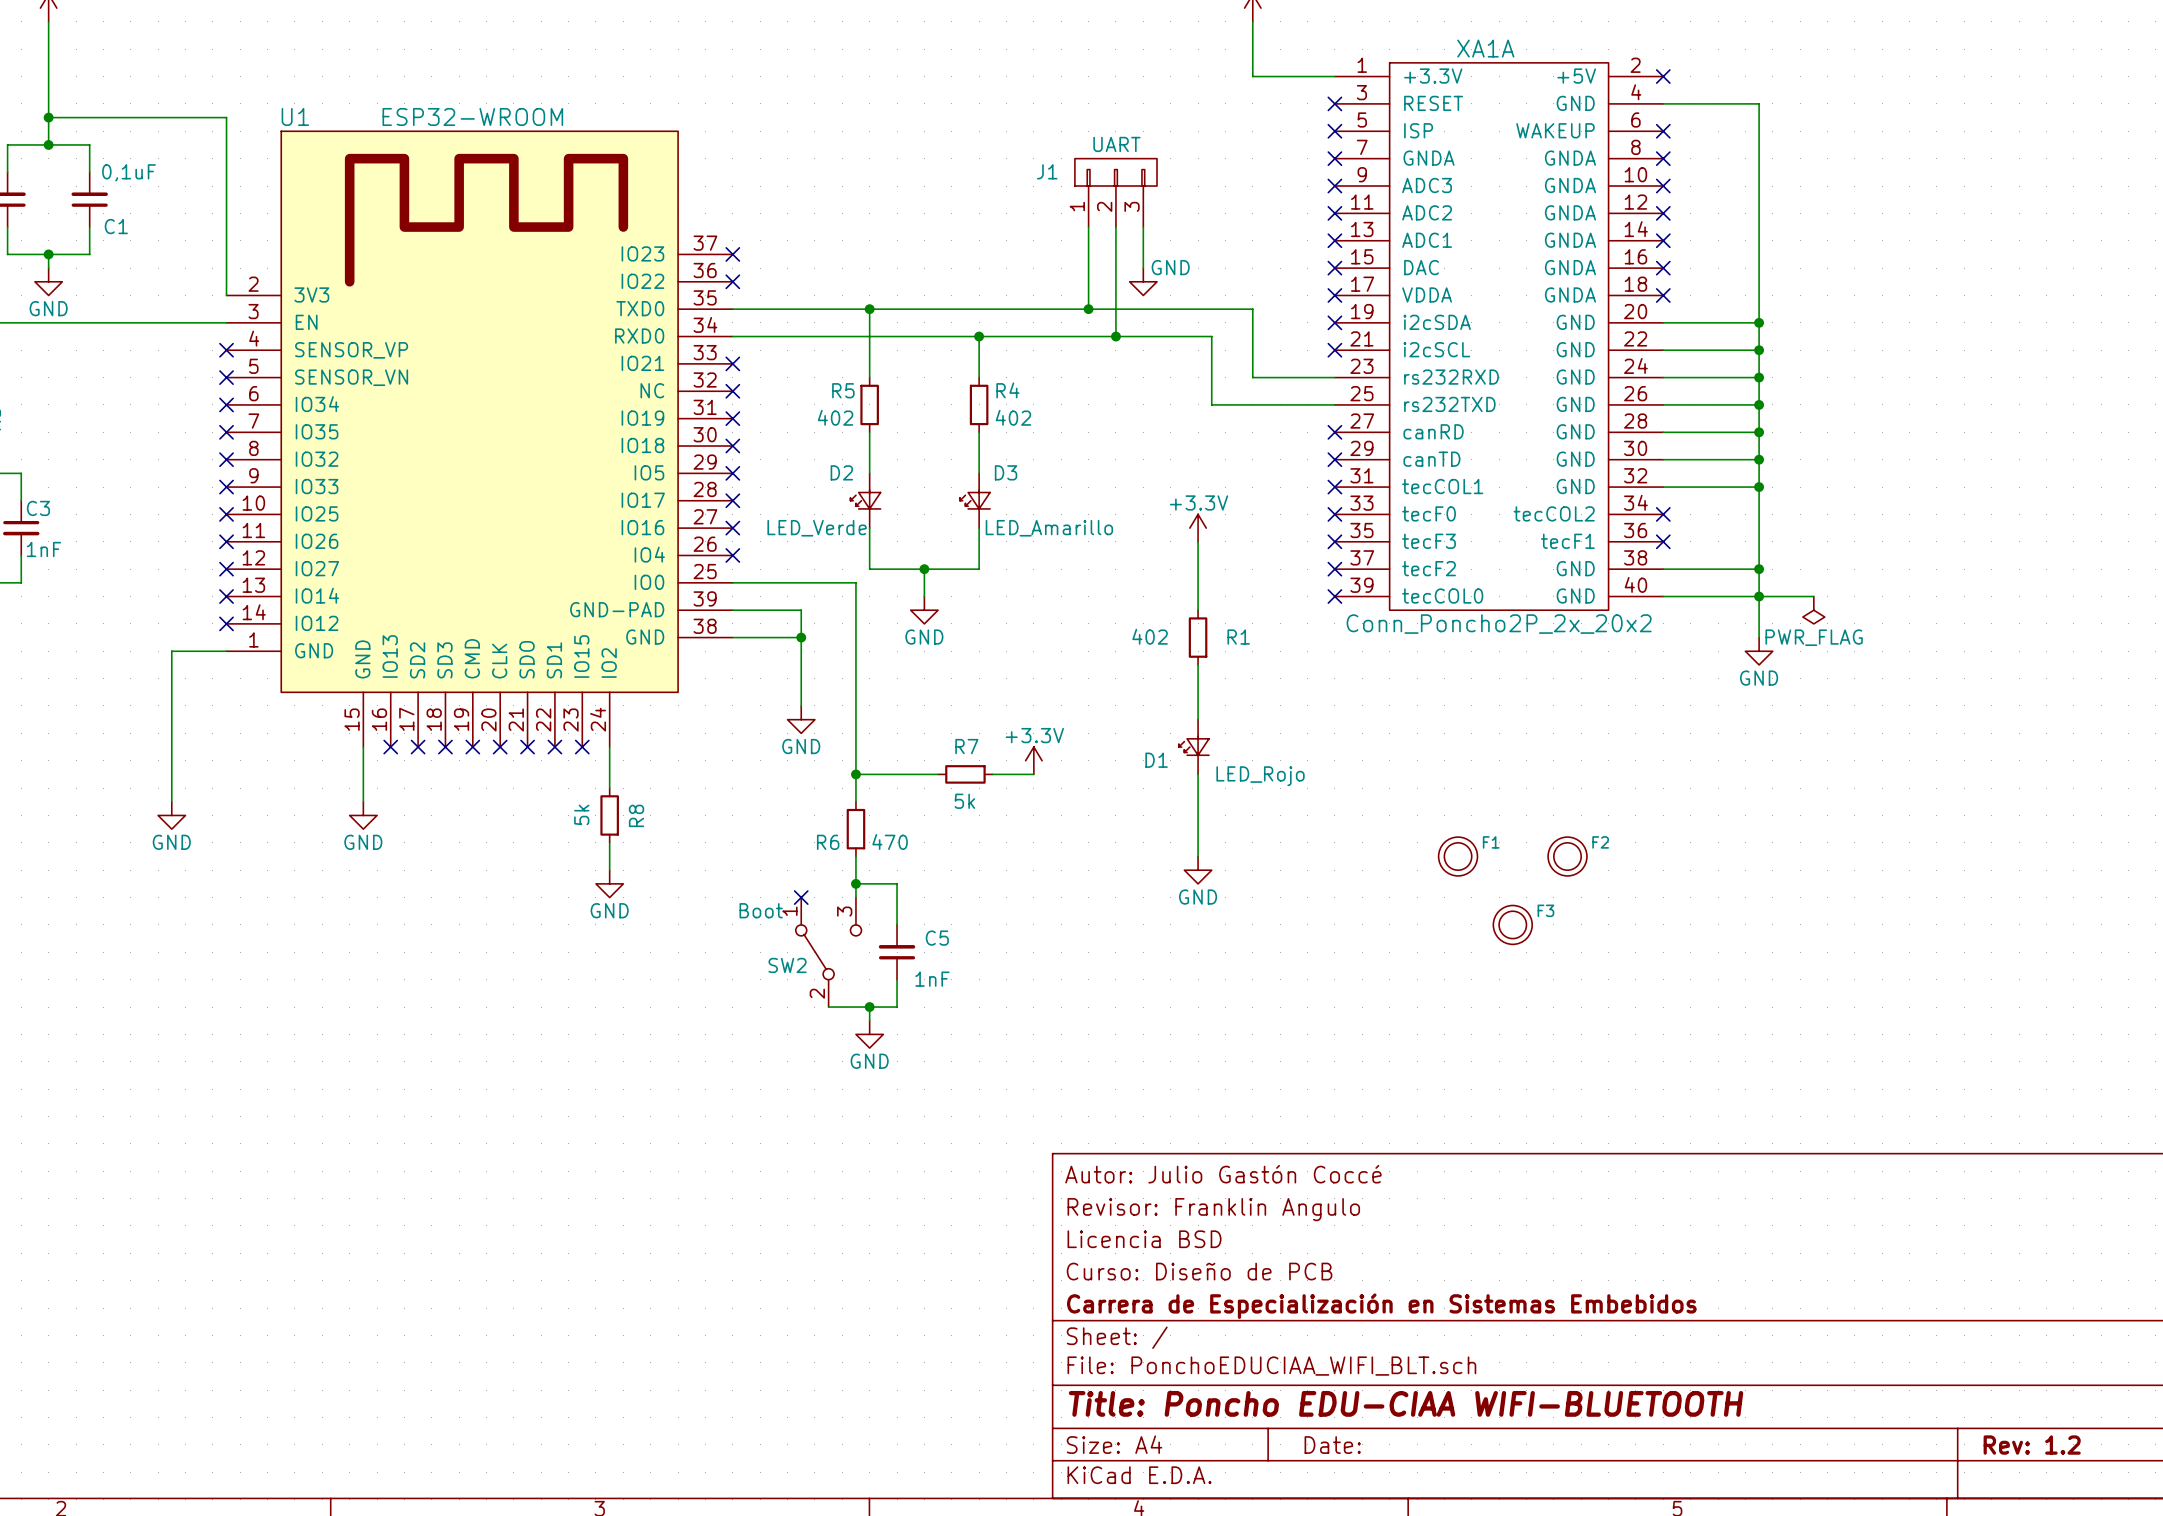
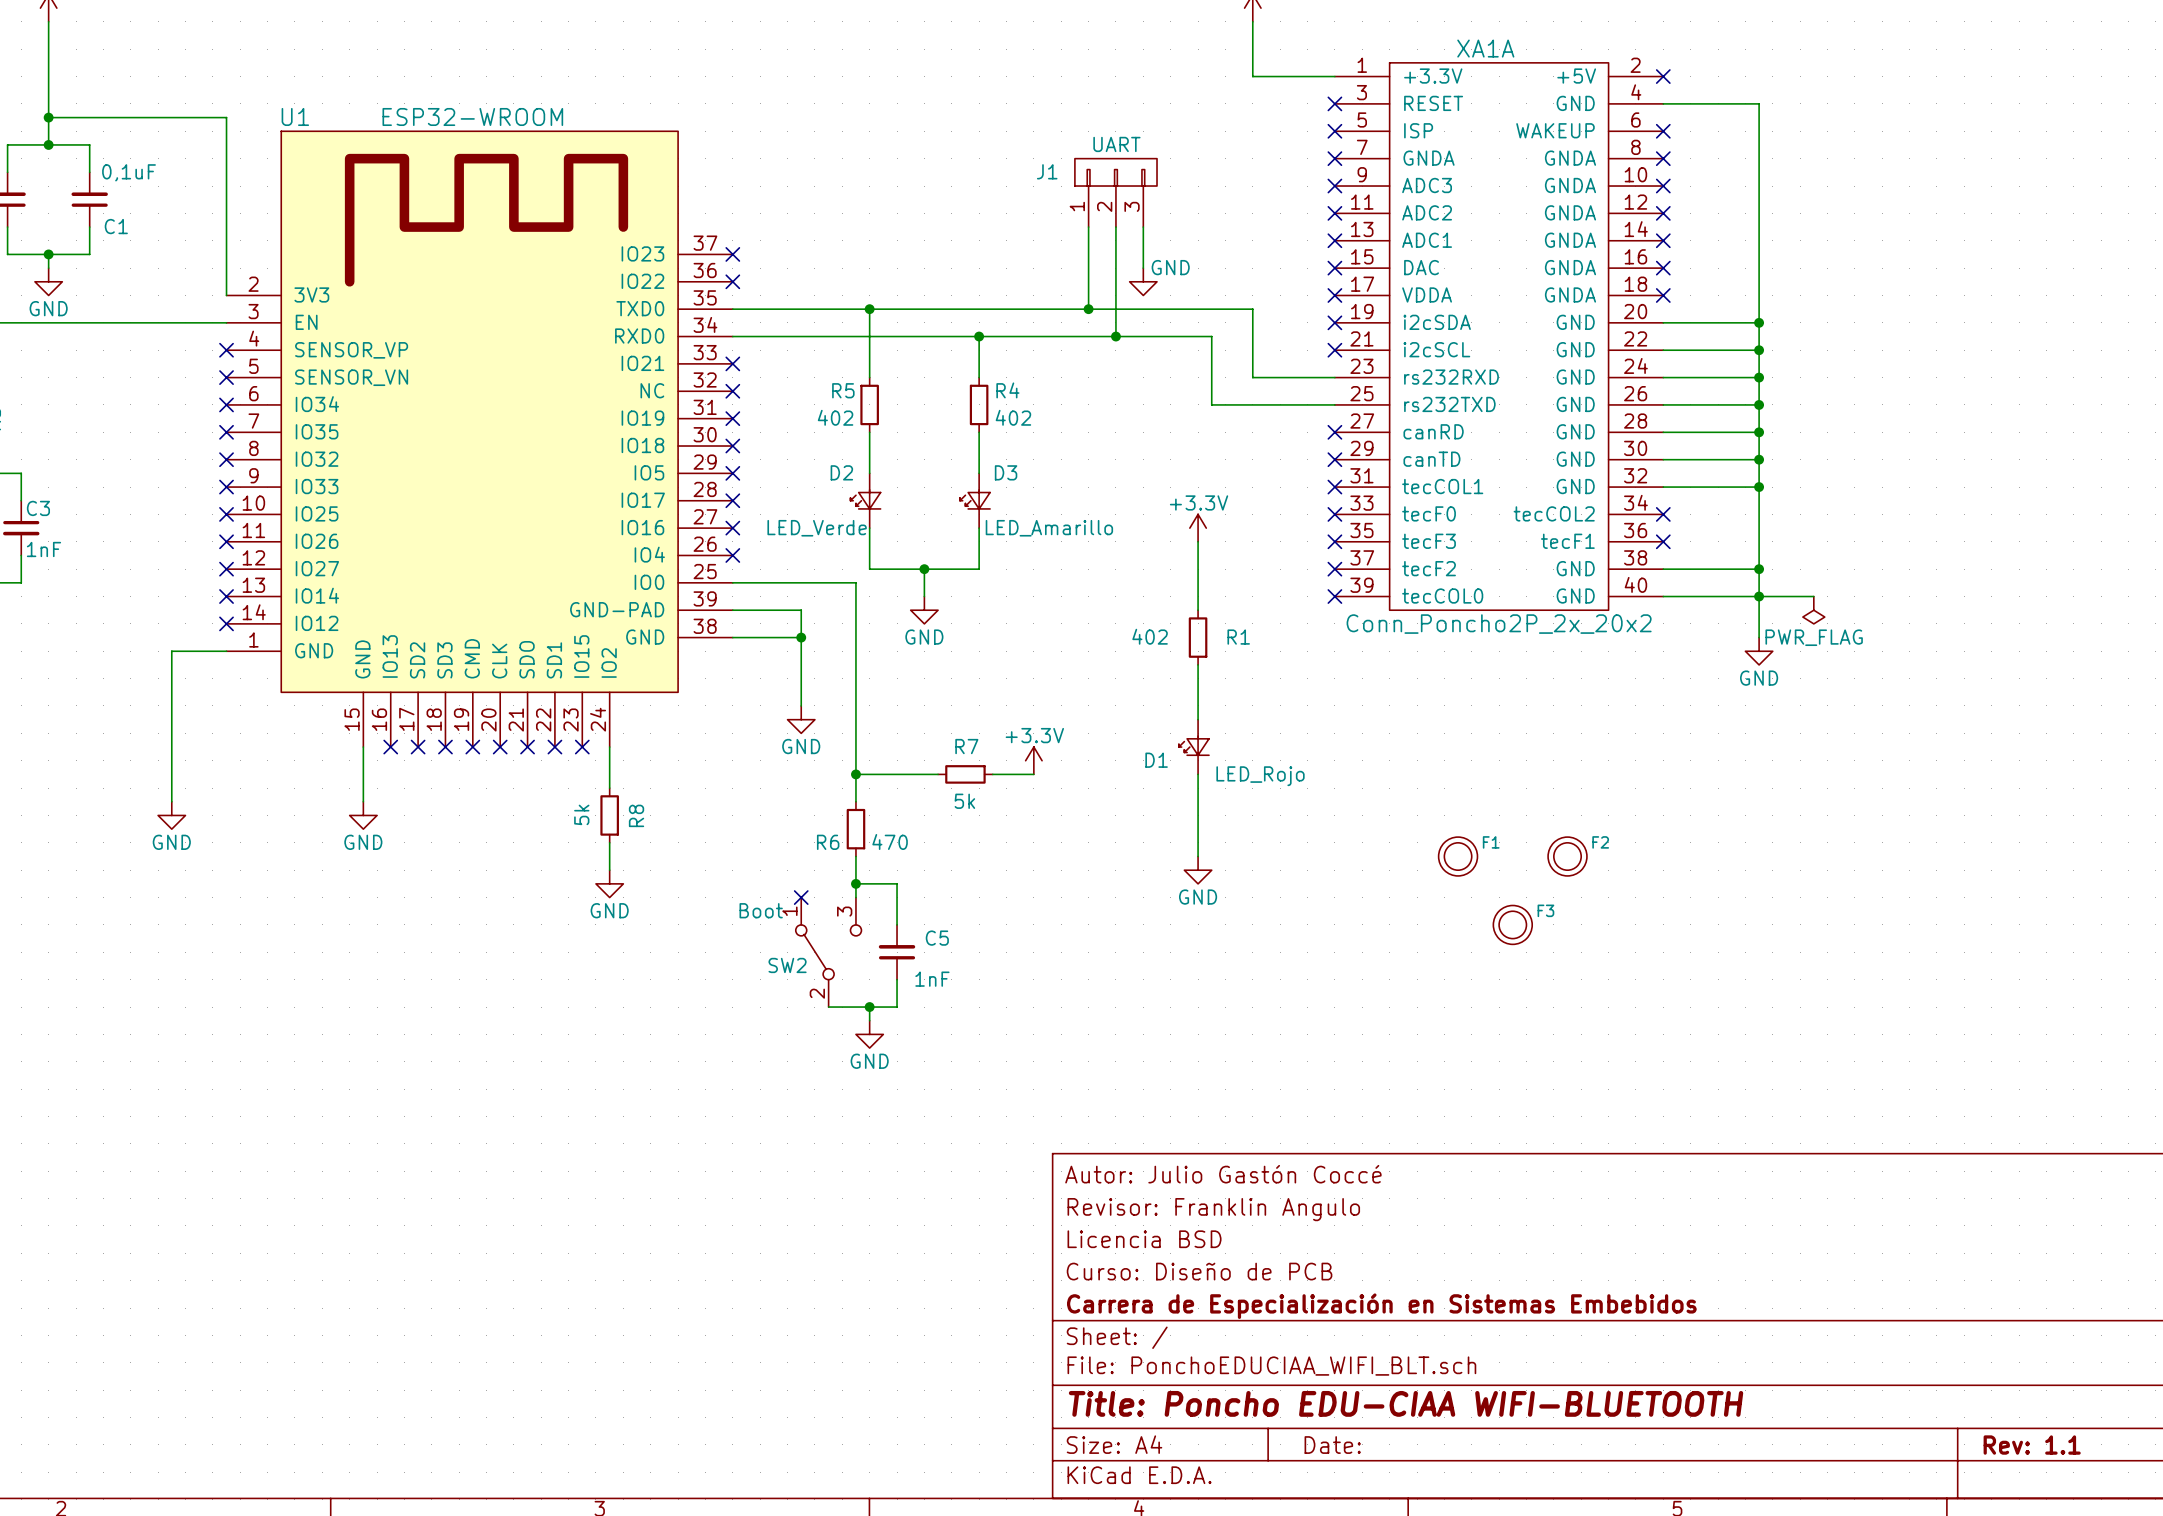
title block: Rev: 1.2 (2032, 1445) -> Rev: 1.1 (2032, 1445)

